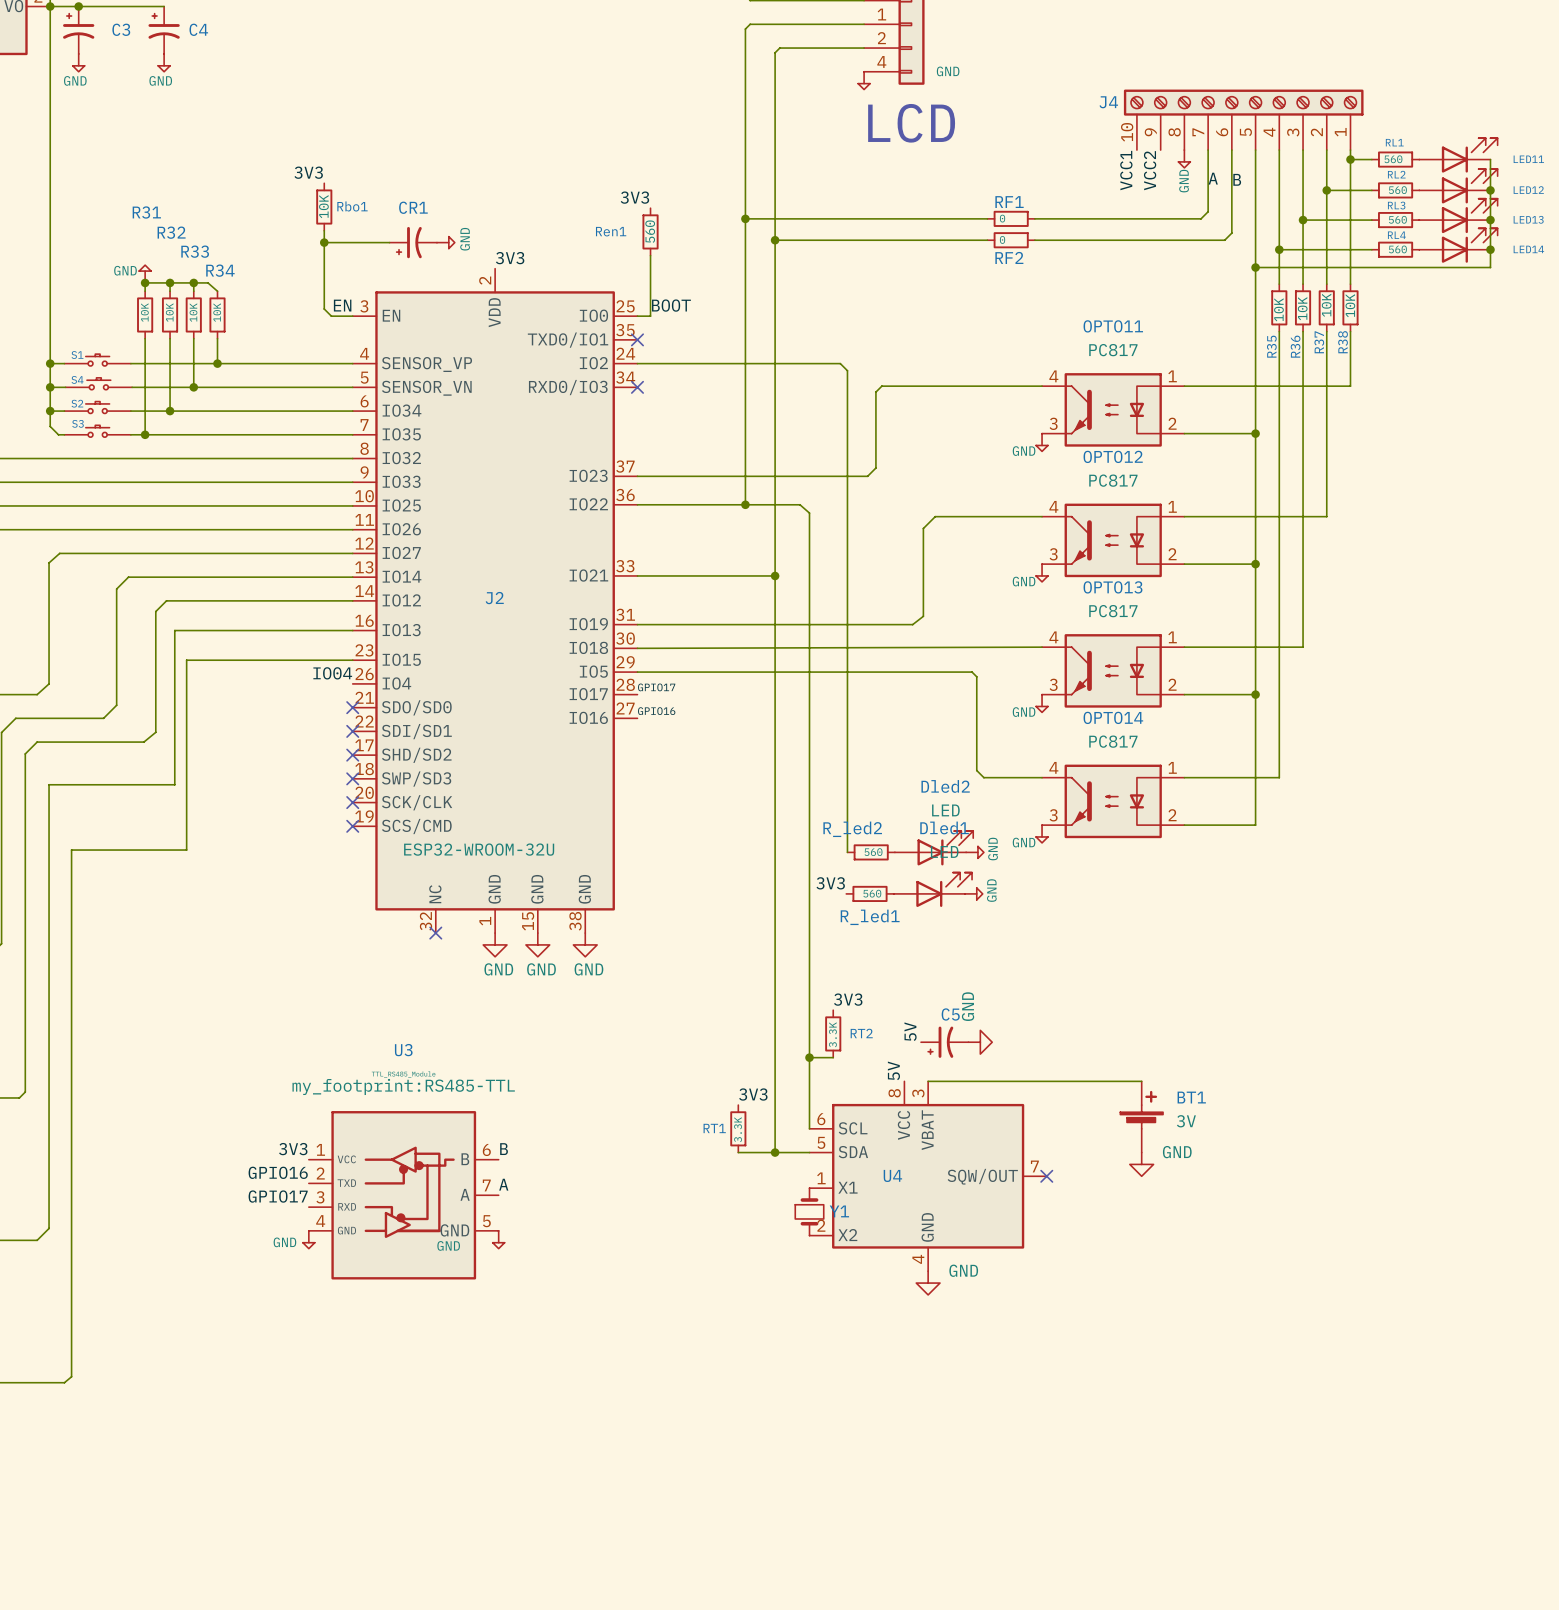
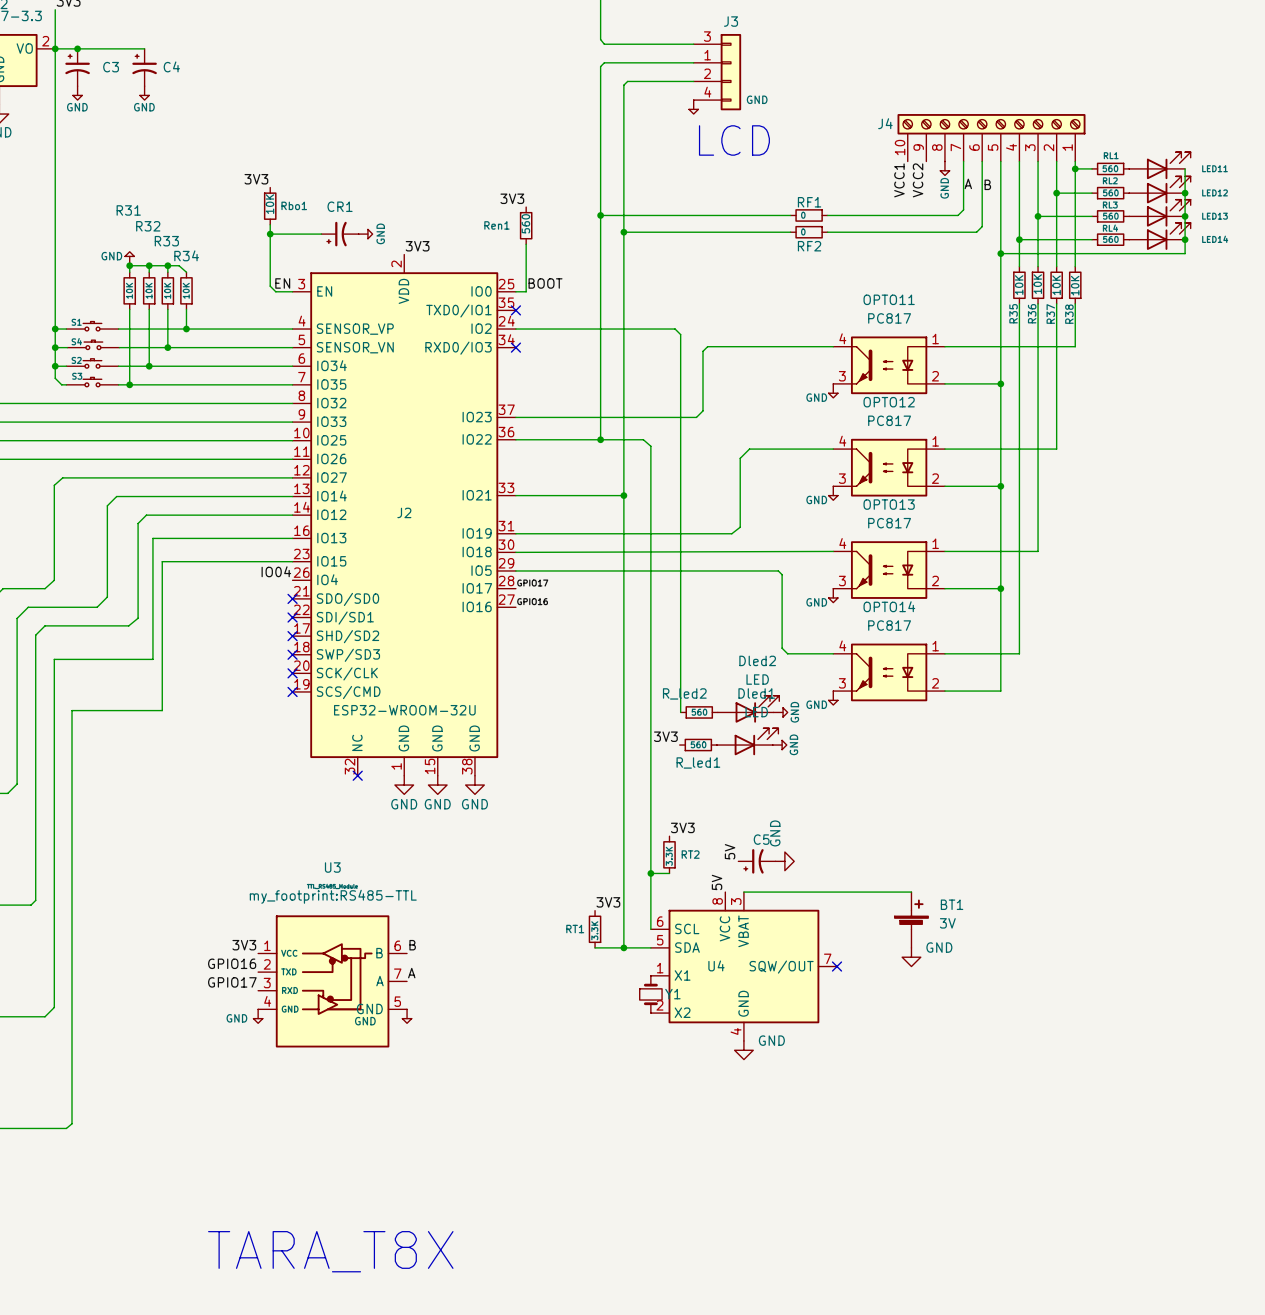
text: none -> TARA_T8X (330, 1251)

